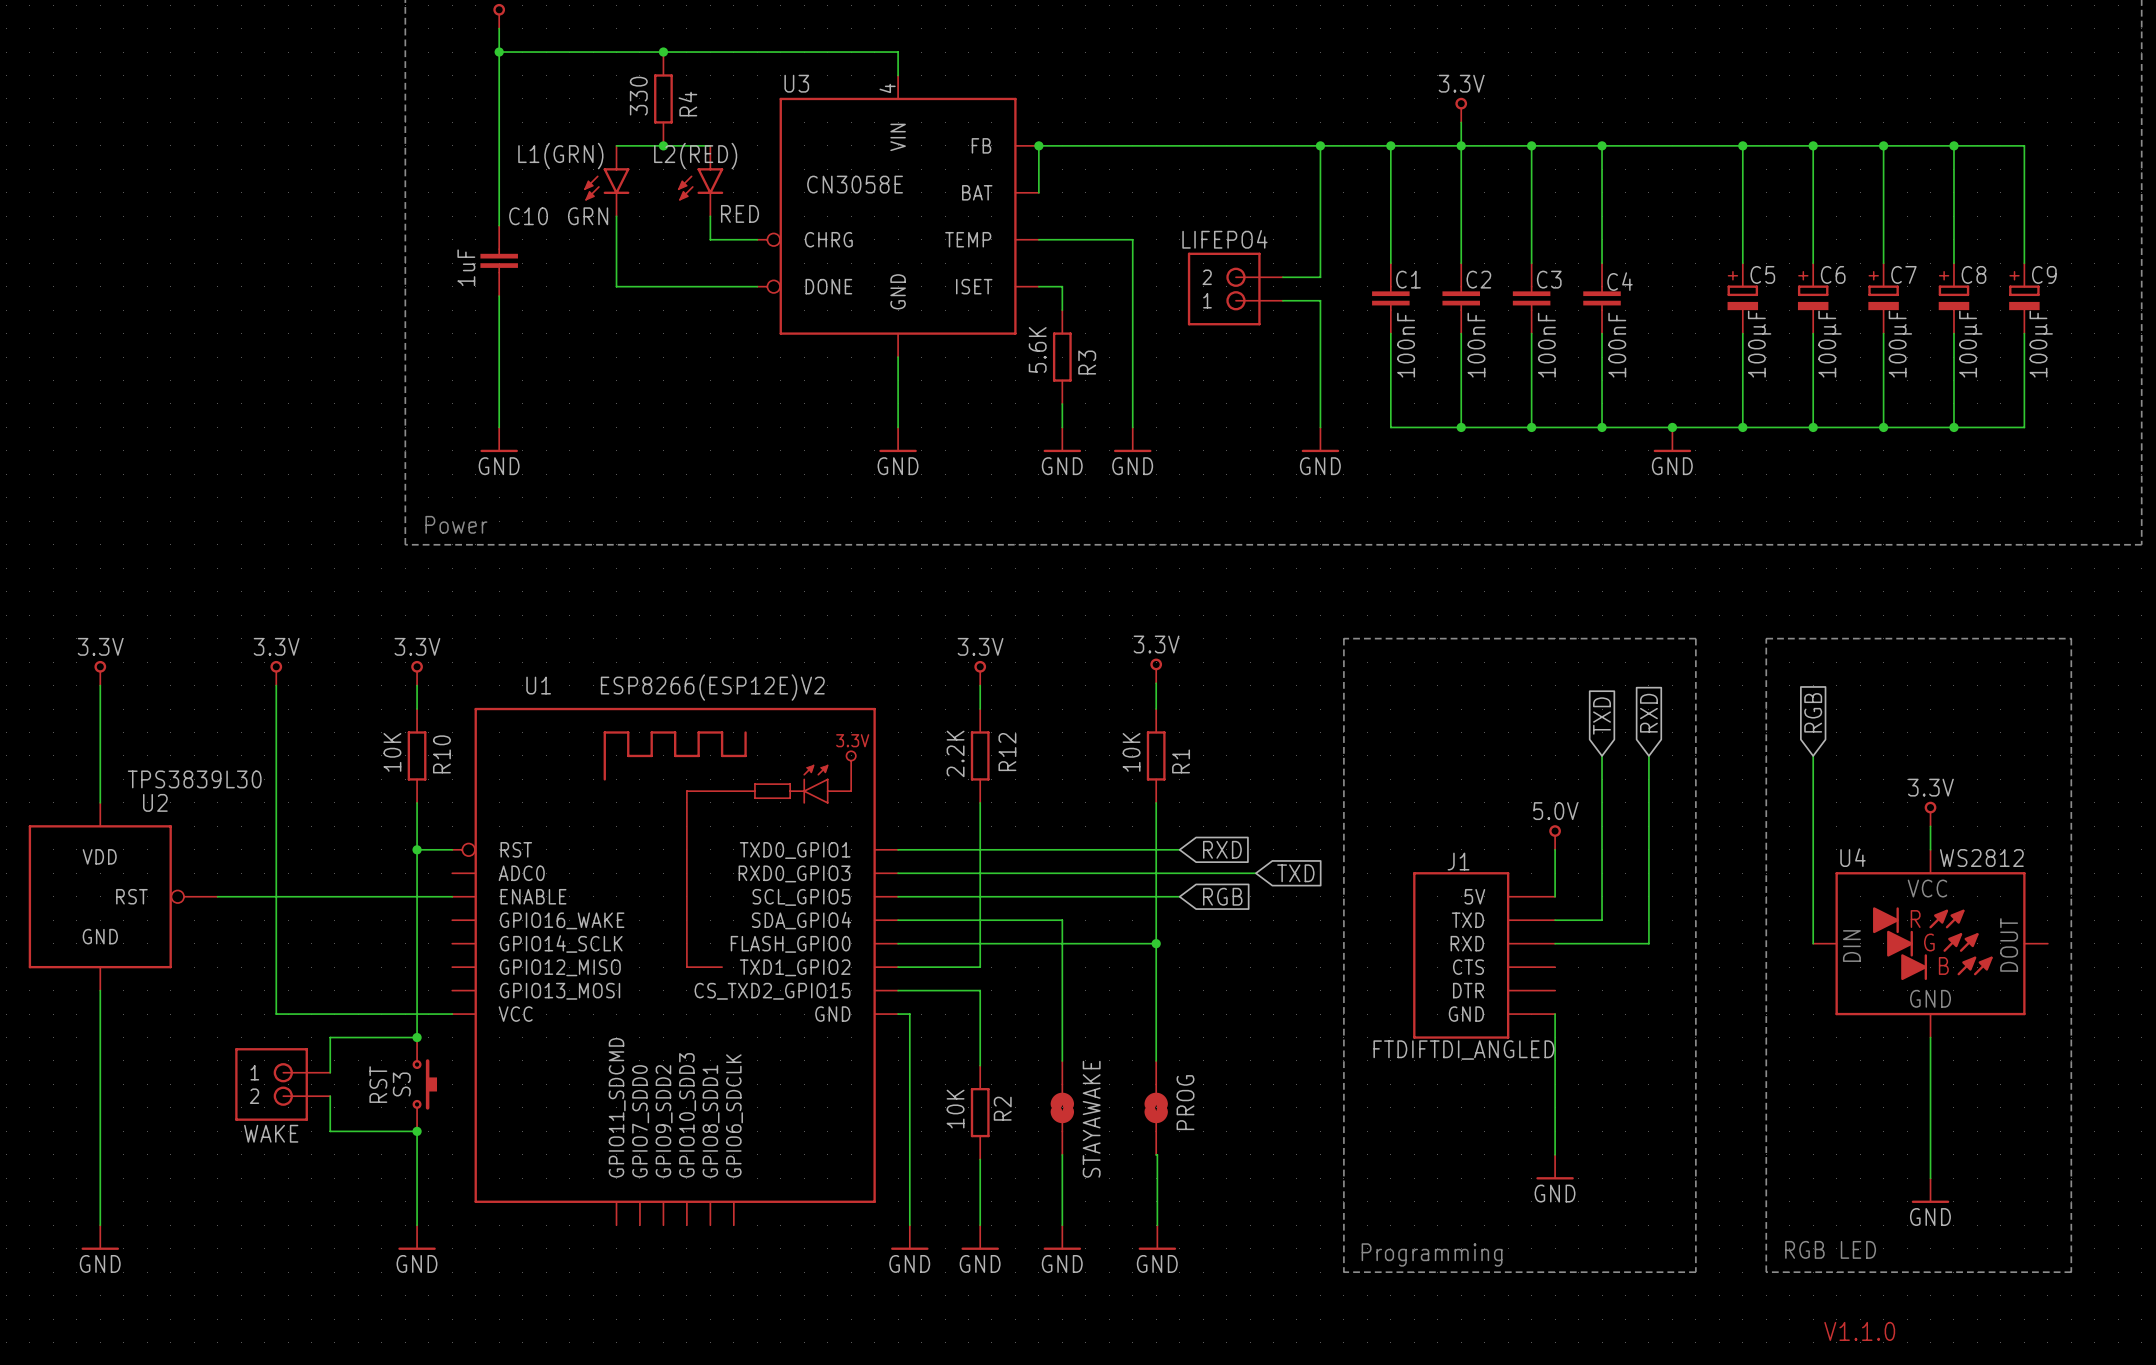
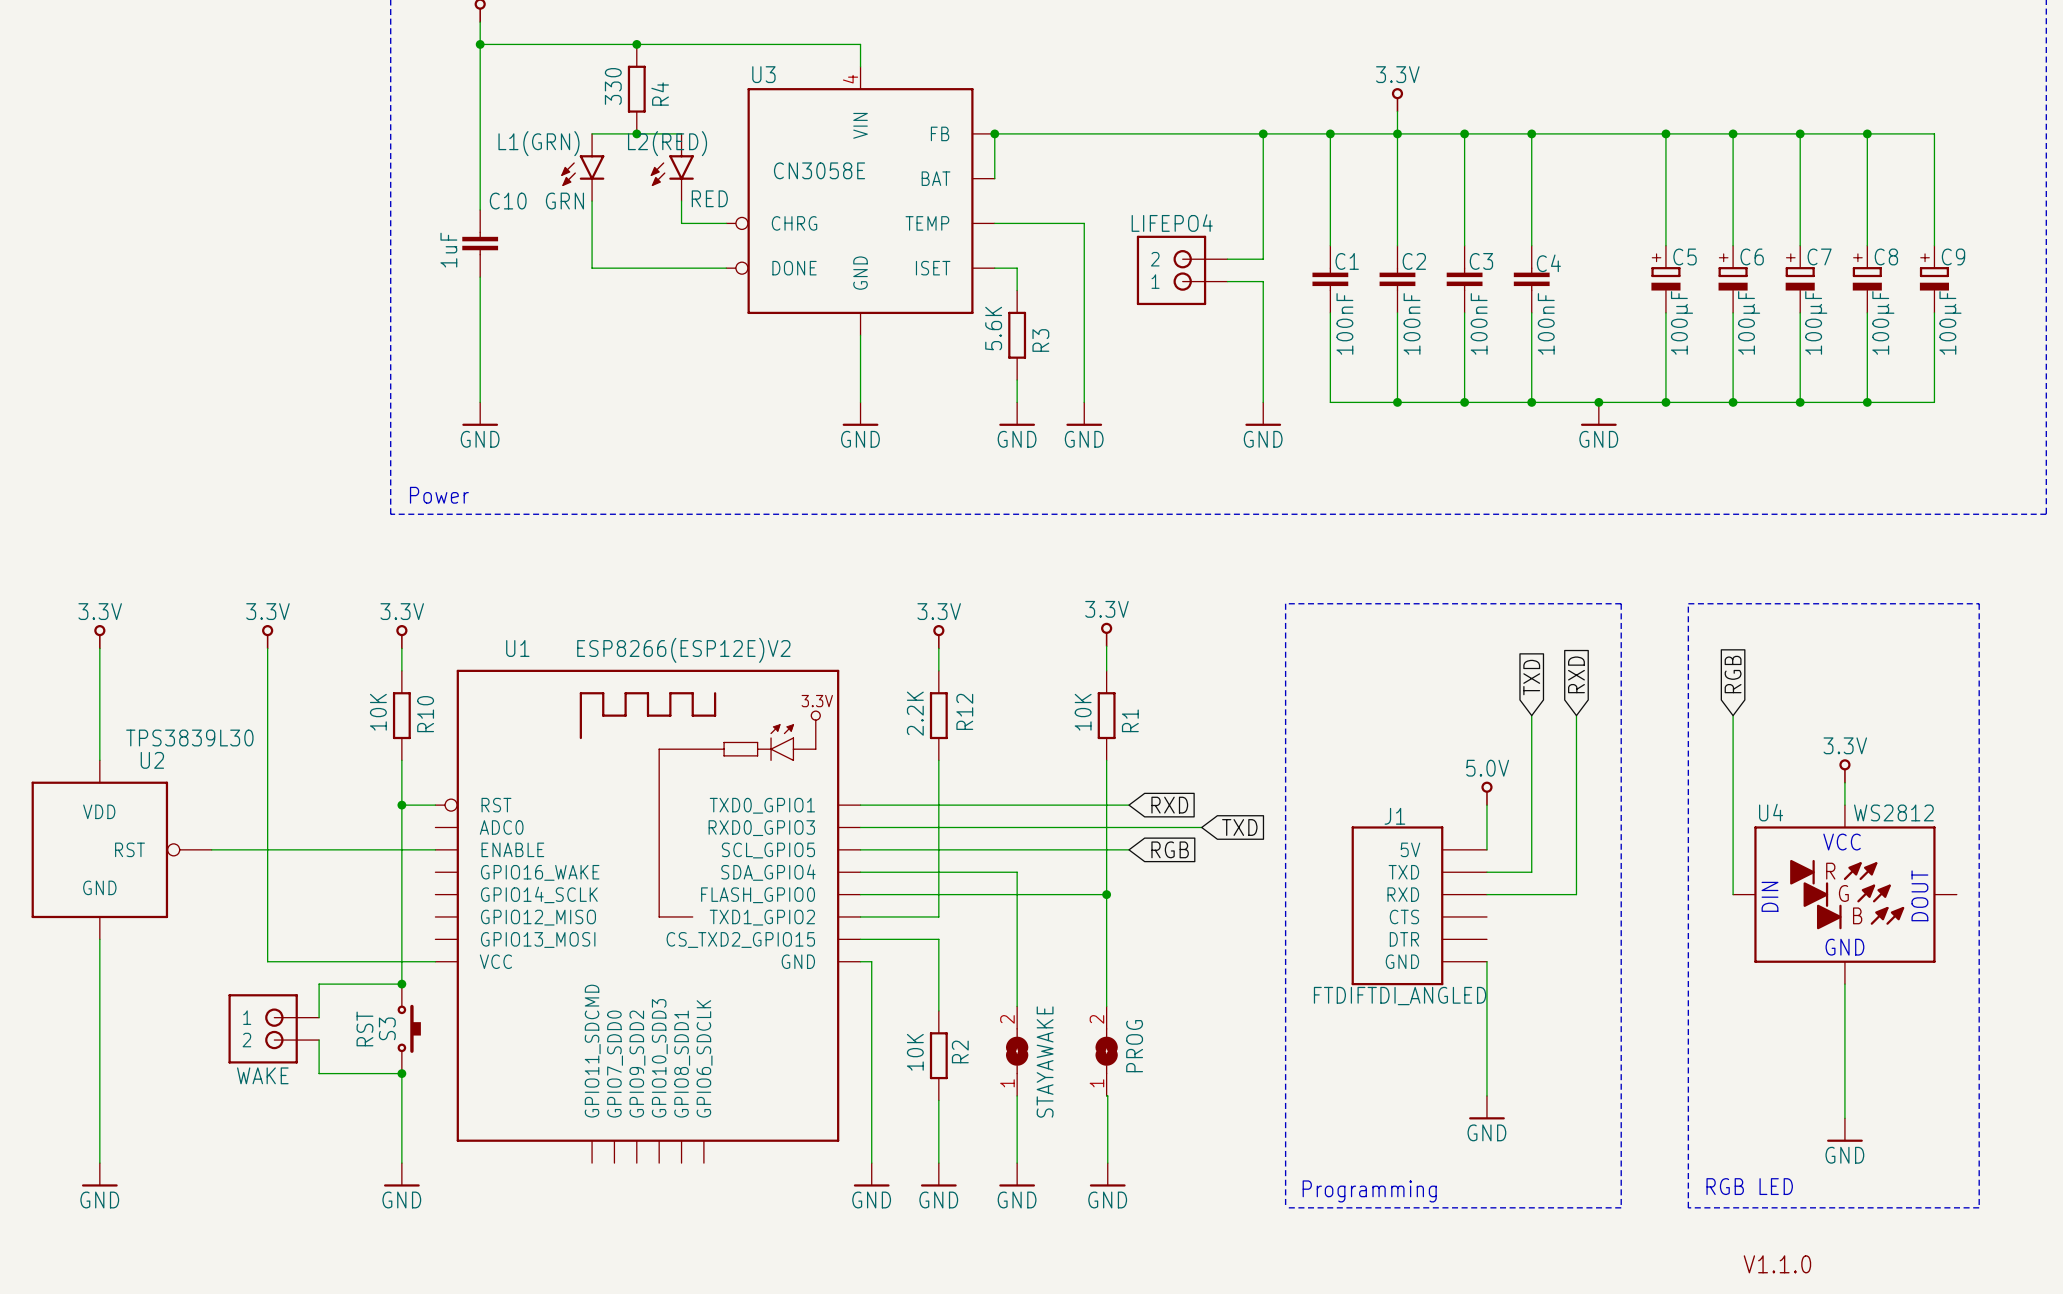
STAYAWAKE pin number: none -> 2 (1007, 1019)
PROG pin number: none -> 2 (1096, 1019)
STAYAWAKE pin number: none -> 1 (1007, 1083)
PROG pin number: none -> 1 (1096, 1083)

